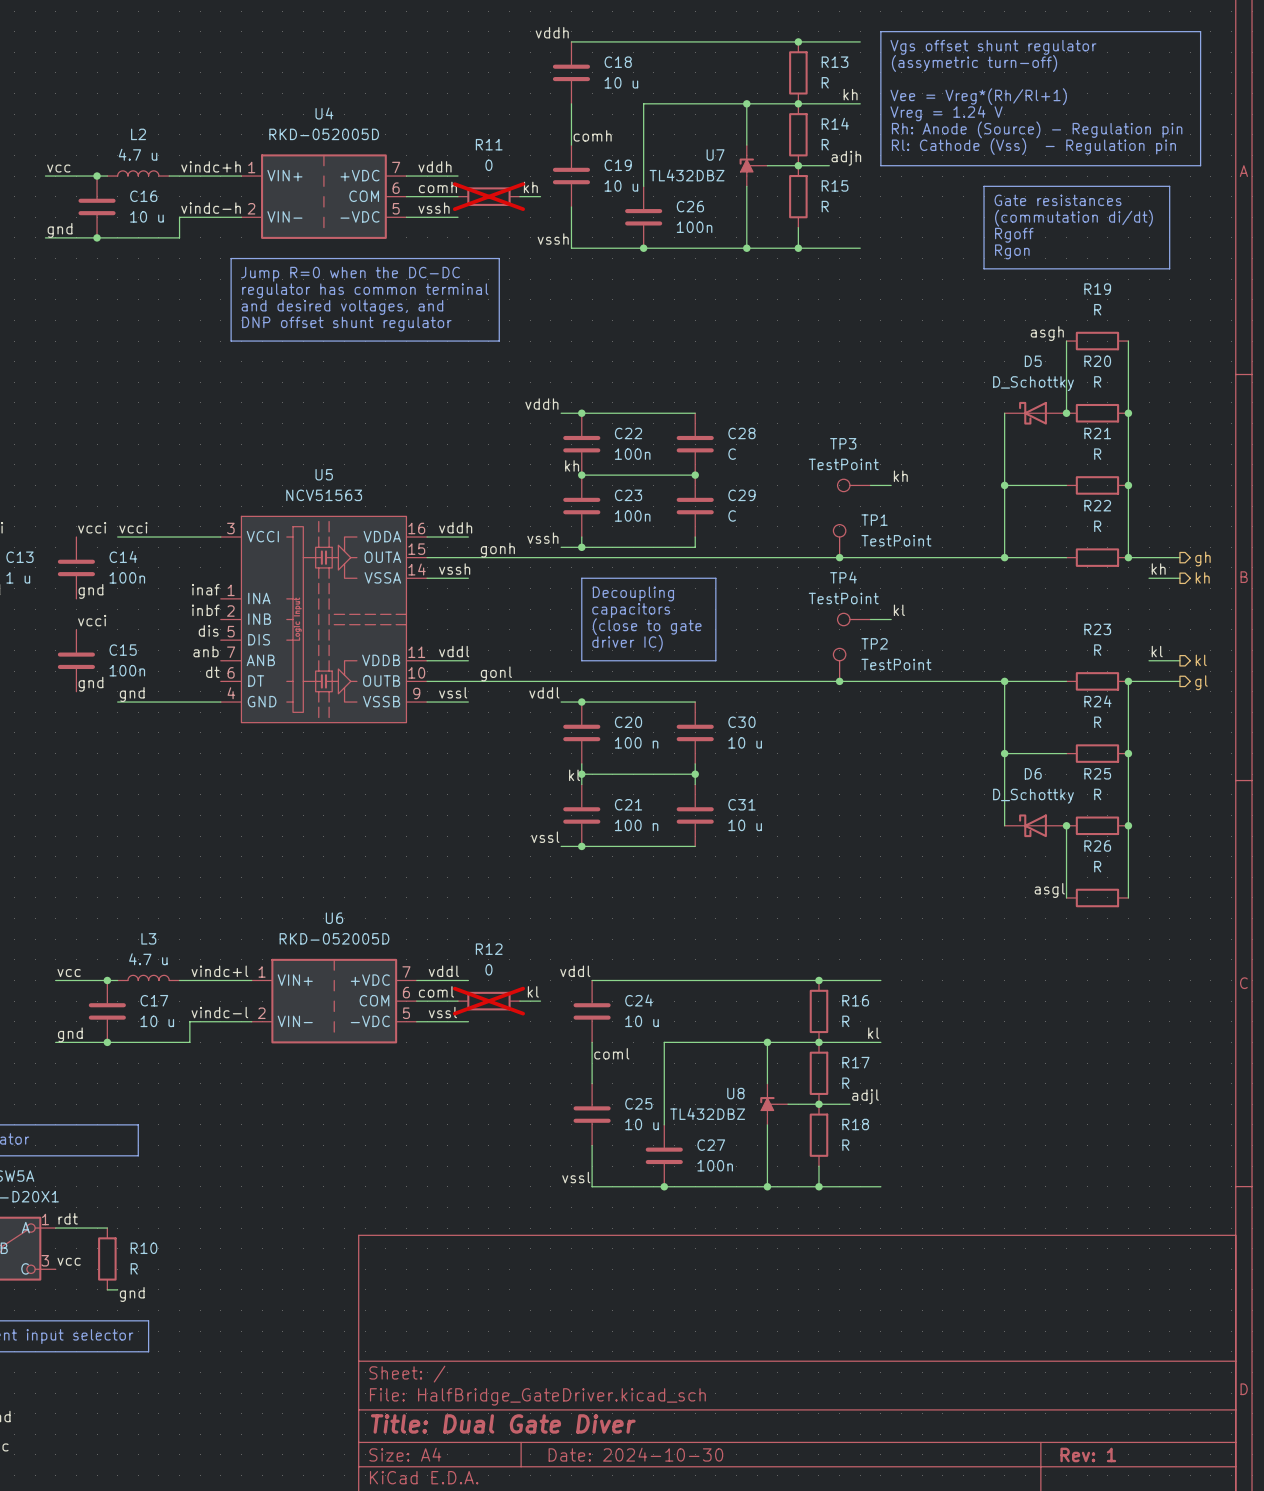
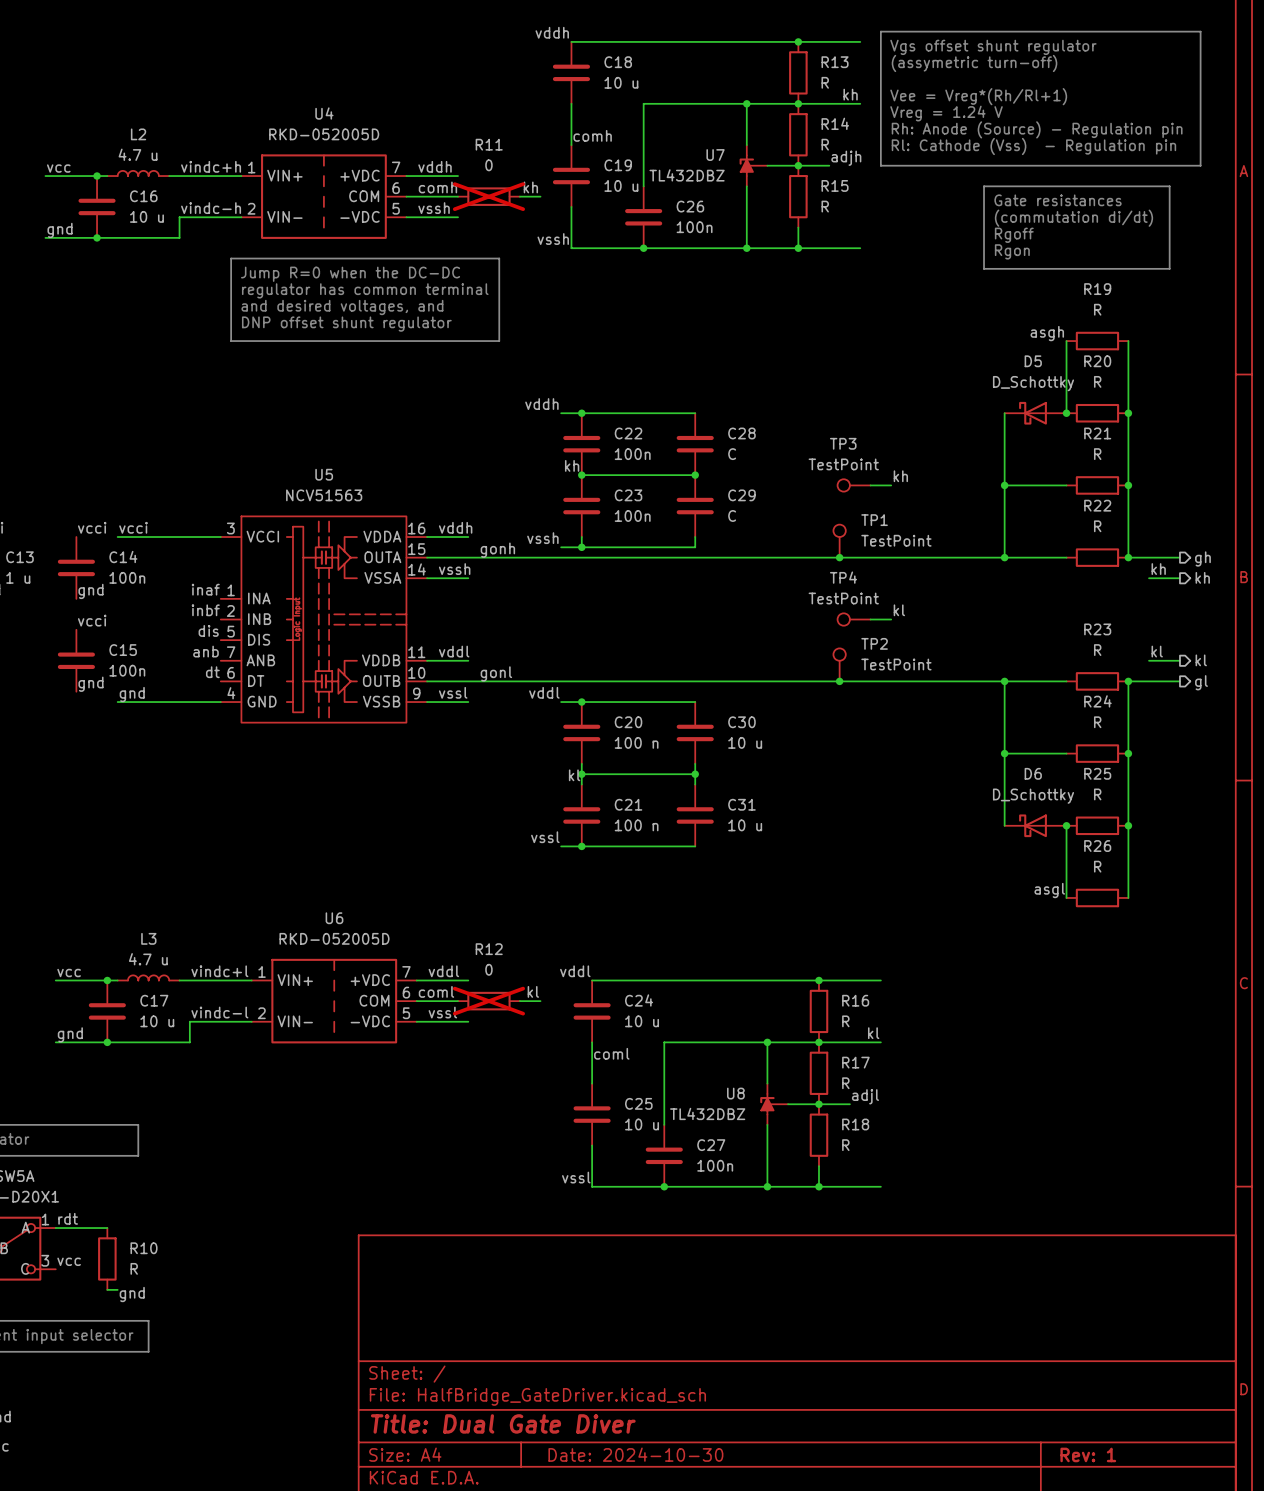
line: (581, 578) (715, 578) (715, 660) (581, 660) (581, 578) -> none
text: Decoupling (633, 593) -> none
text: capacitors (631, 610) -> none
text: (close to gate (647, 626) -> none
text: driver IC) (627, 643) -> none

